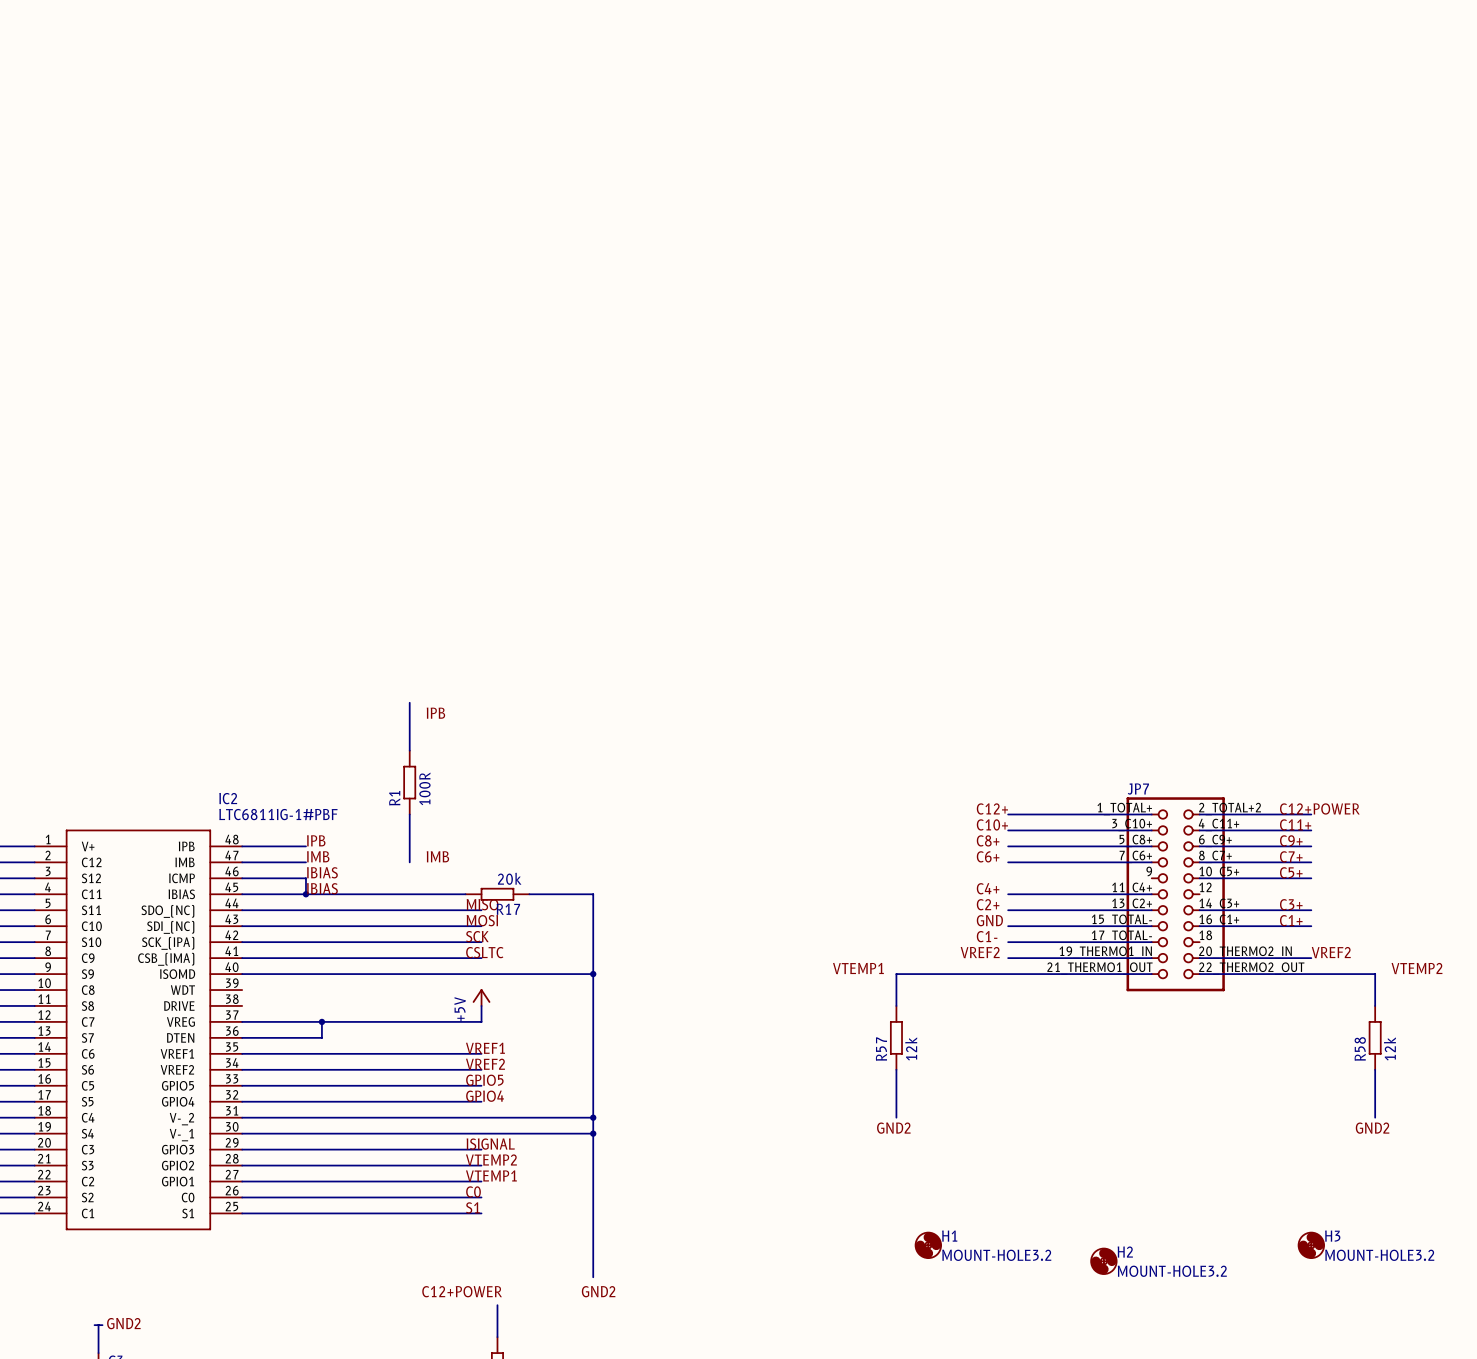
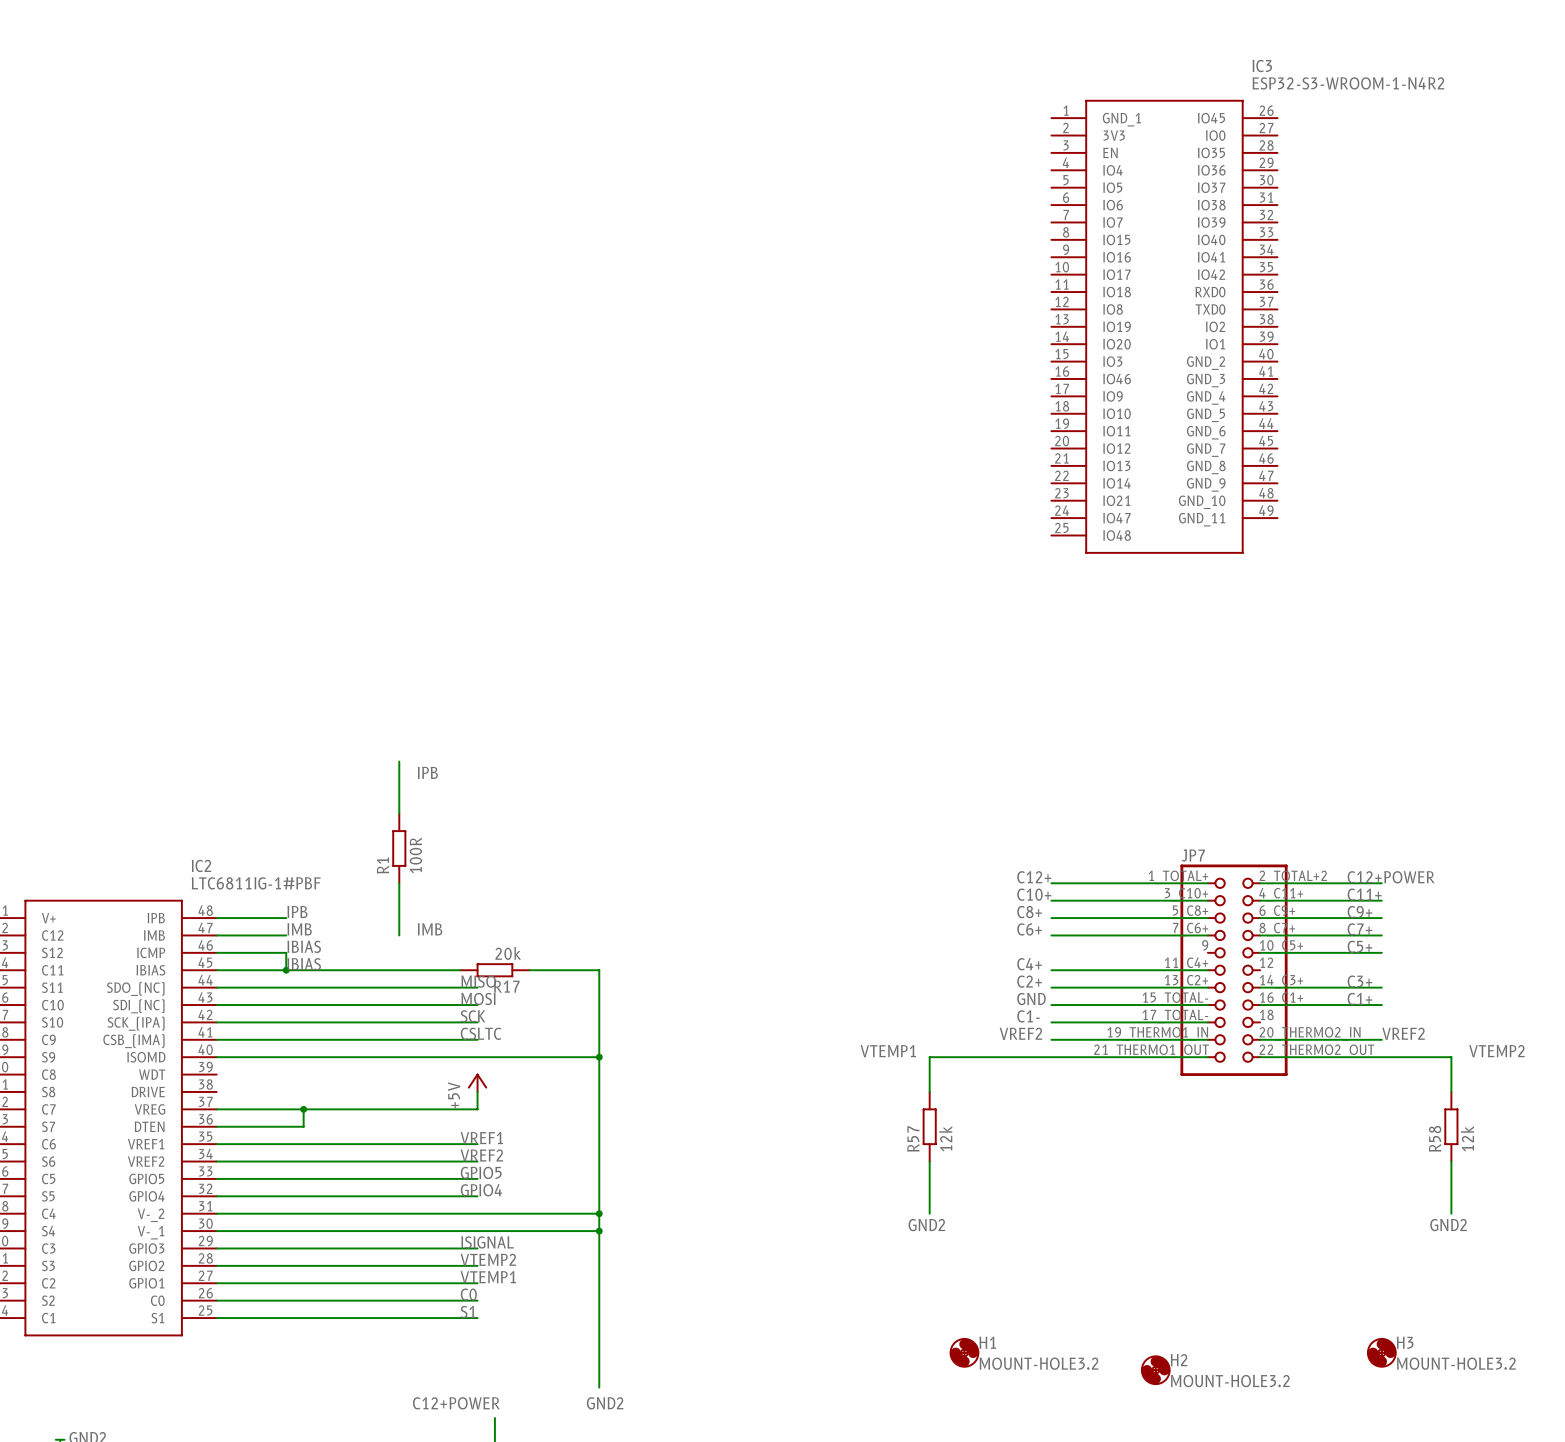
IC3: none -> ESP32-S3-WROOM-1-N4R2 (1164, 326)

